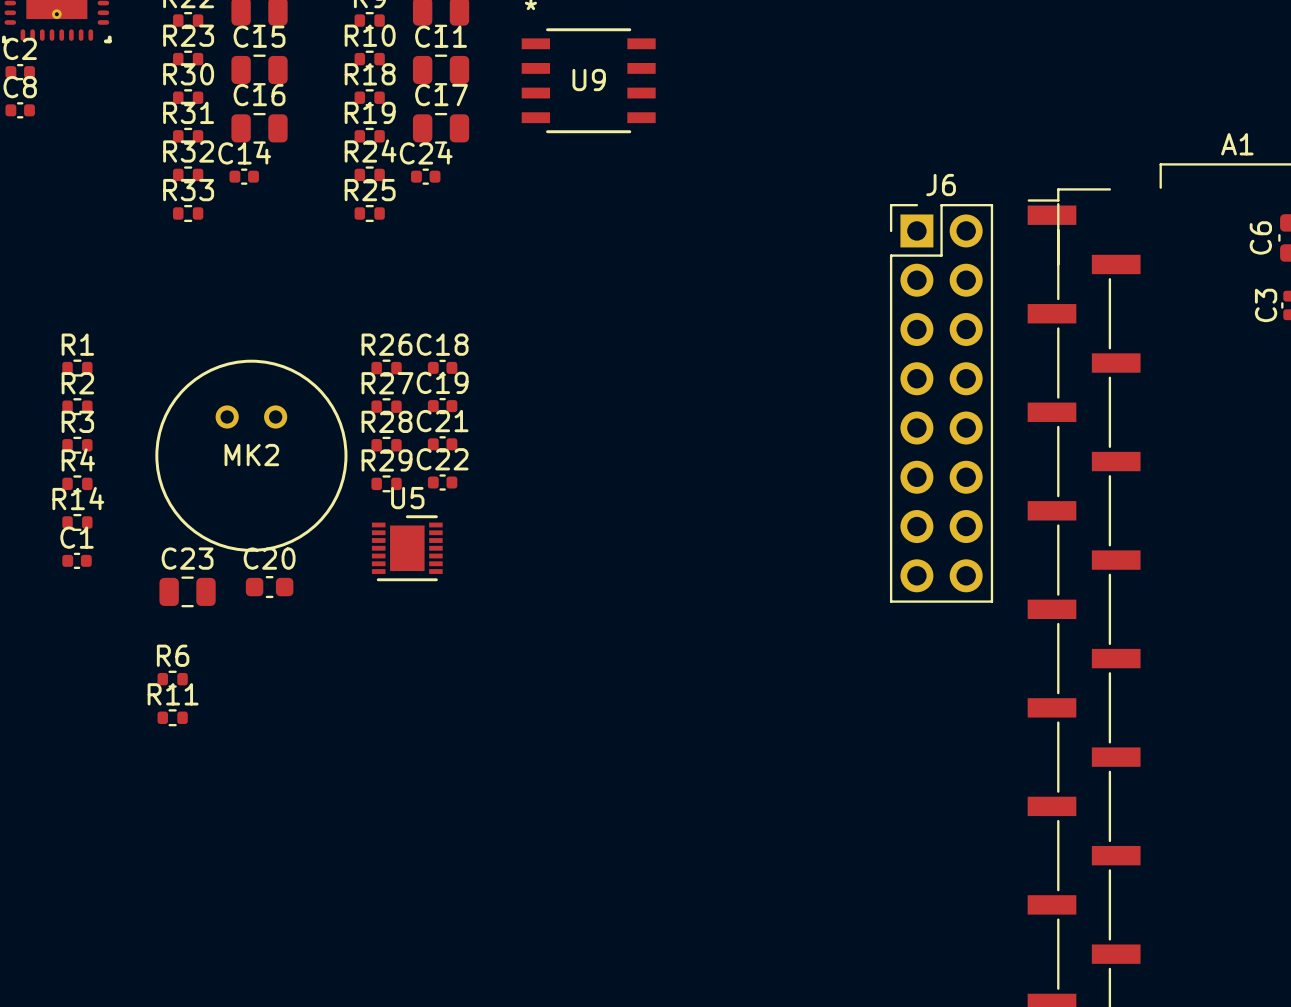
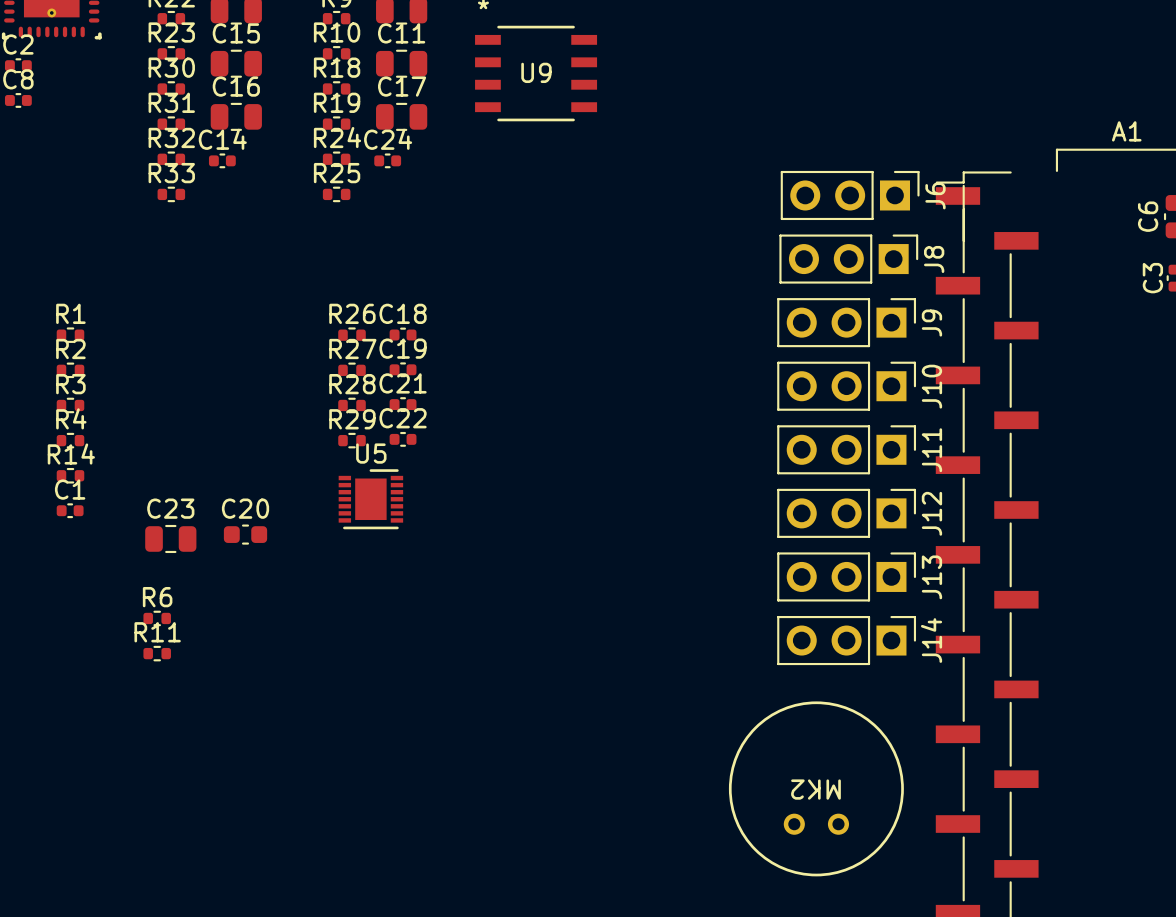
J6 name position: J6 (941, 185) -> J6 (935, 195)
J6 footprint: [889, 204, 994, 603] -> [780, 170, 920, 221]
J8: none -> (848, 259)
J9: none -> (846, 322)
J10: none -> (846, 386)
MK2 rotation: 0° (251, 455) -> 180° (816, 788)
MK2 position: (251, 455) -> (816, 788)
J11: none -> (846, 449)
J12: none -> (846, 513)
J13: none -> (846, 576)
J14: none -> (846, 640)

